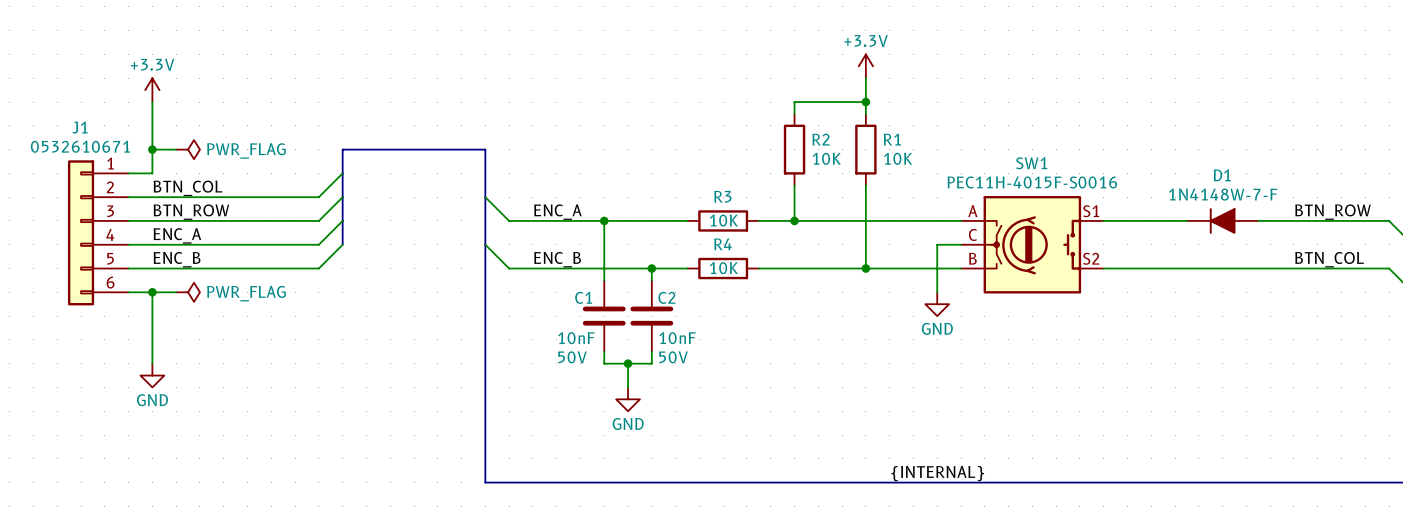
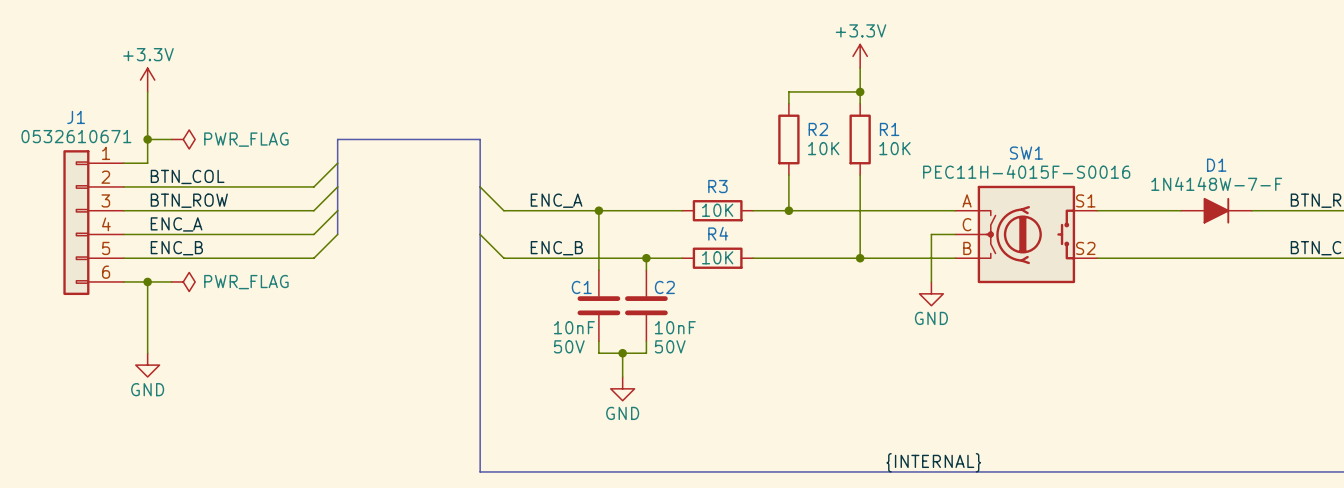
D1 rotation: 0° (1222, 220) -> 180° (1216, 210)

